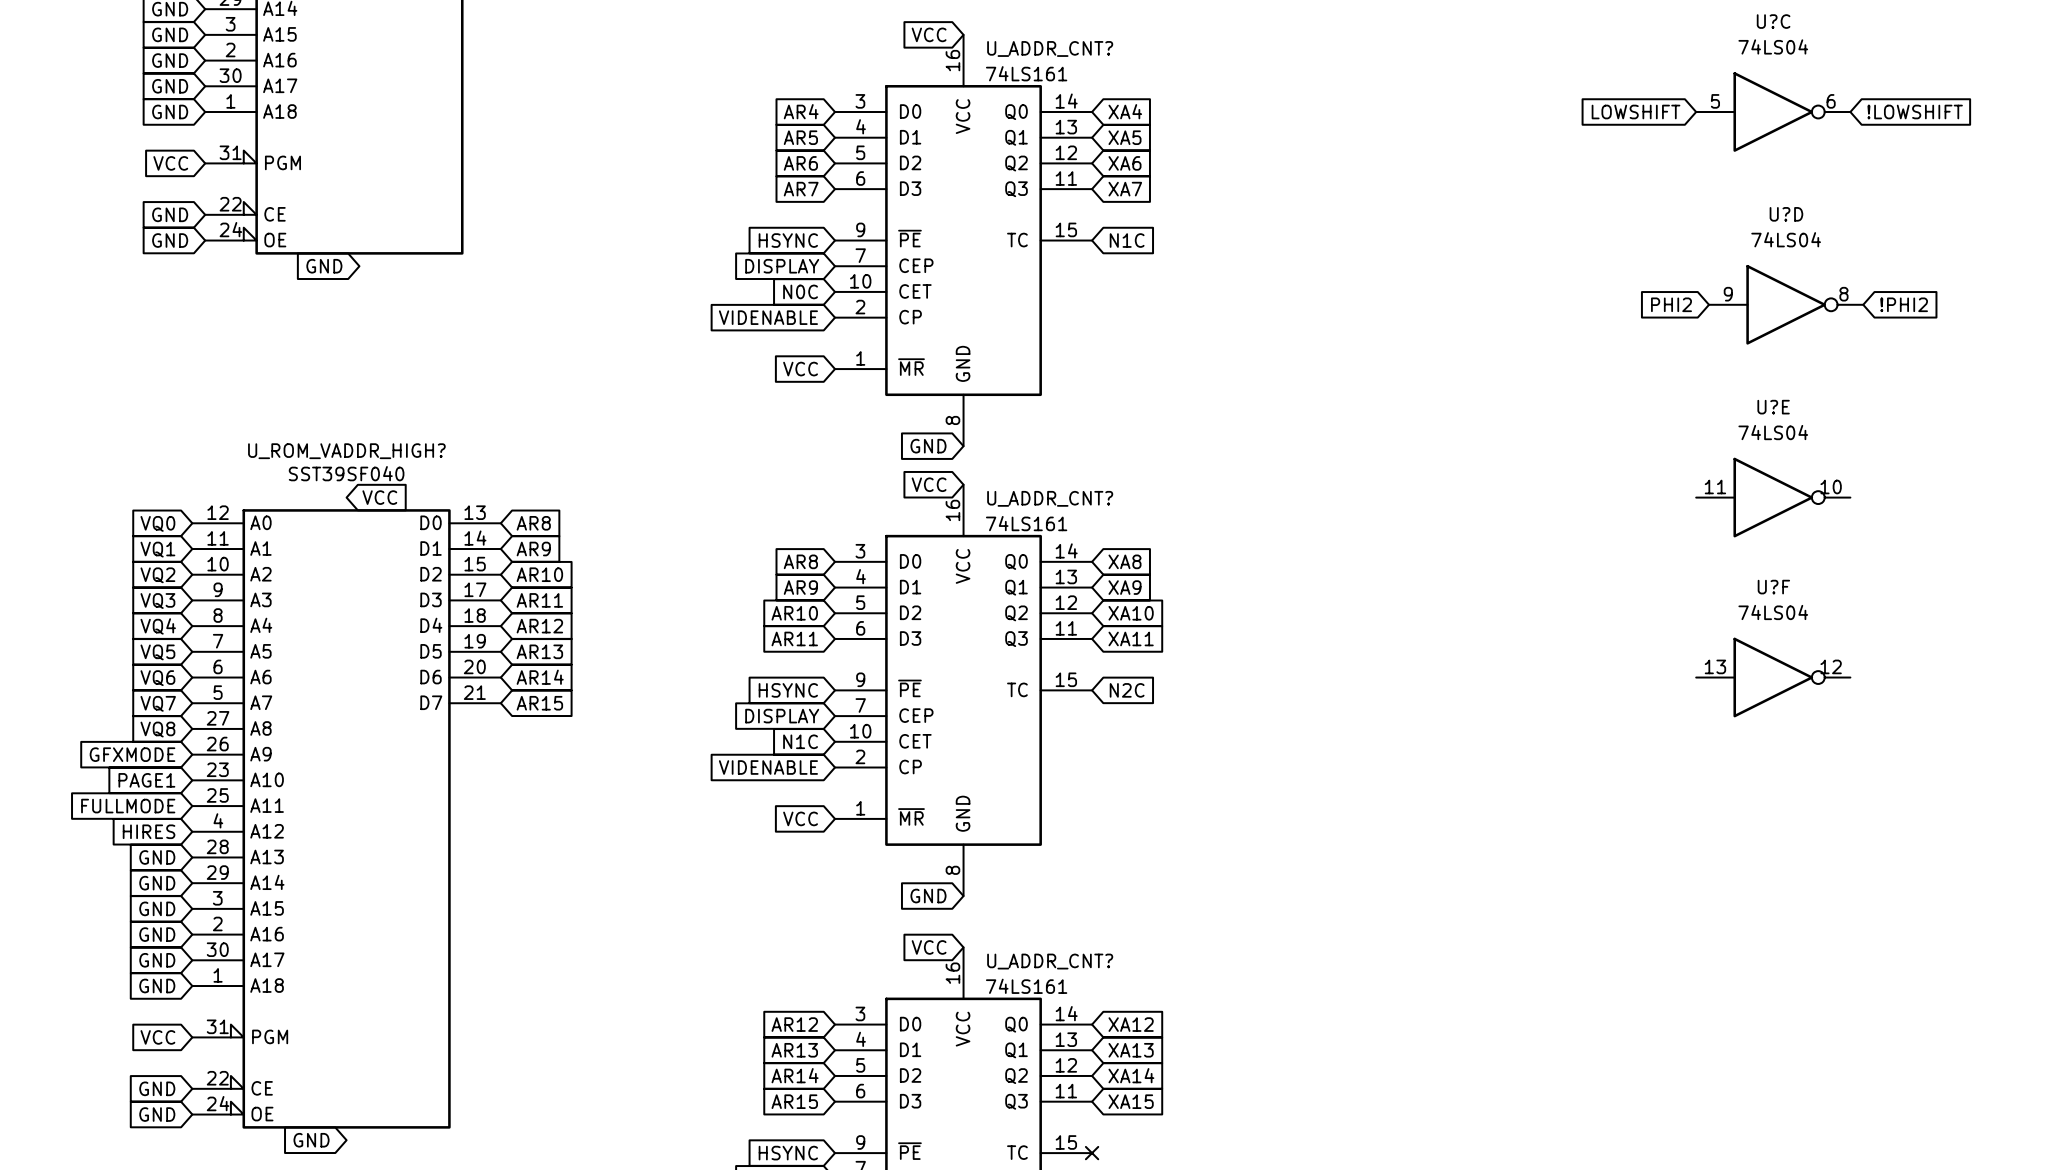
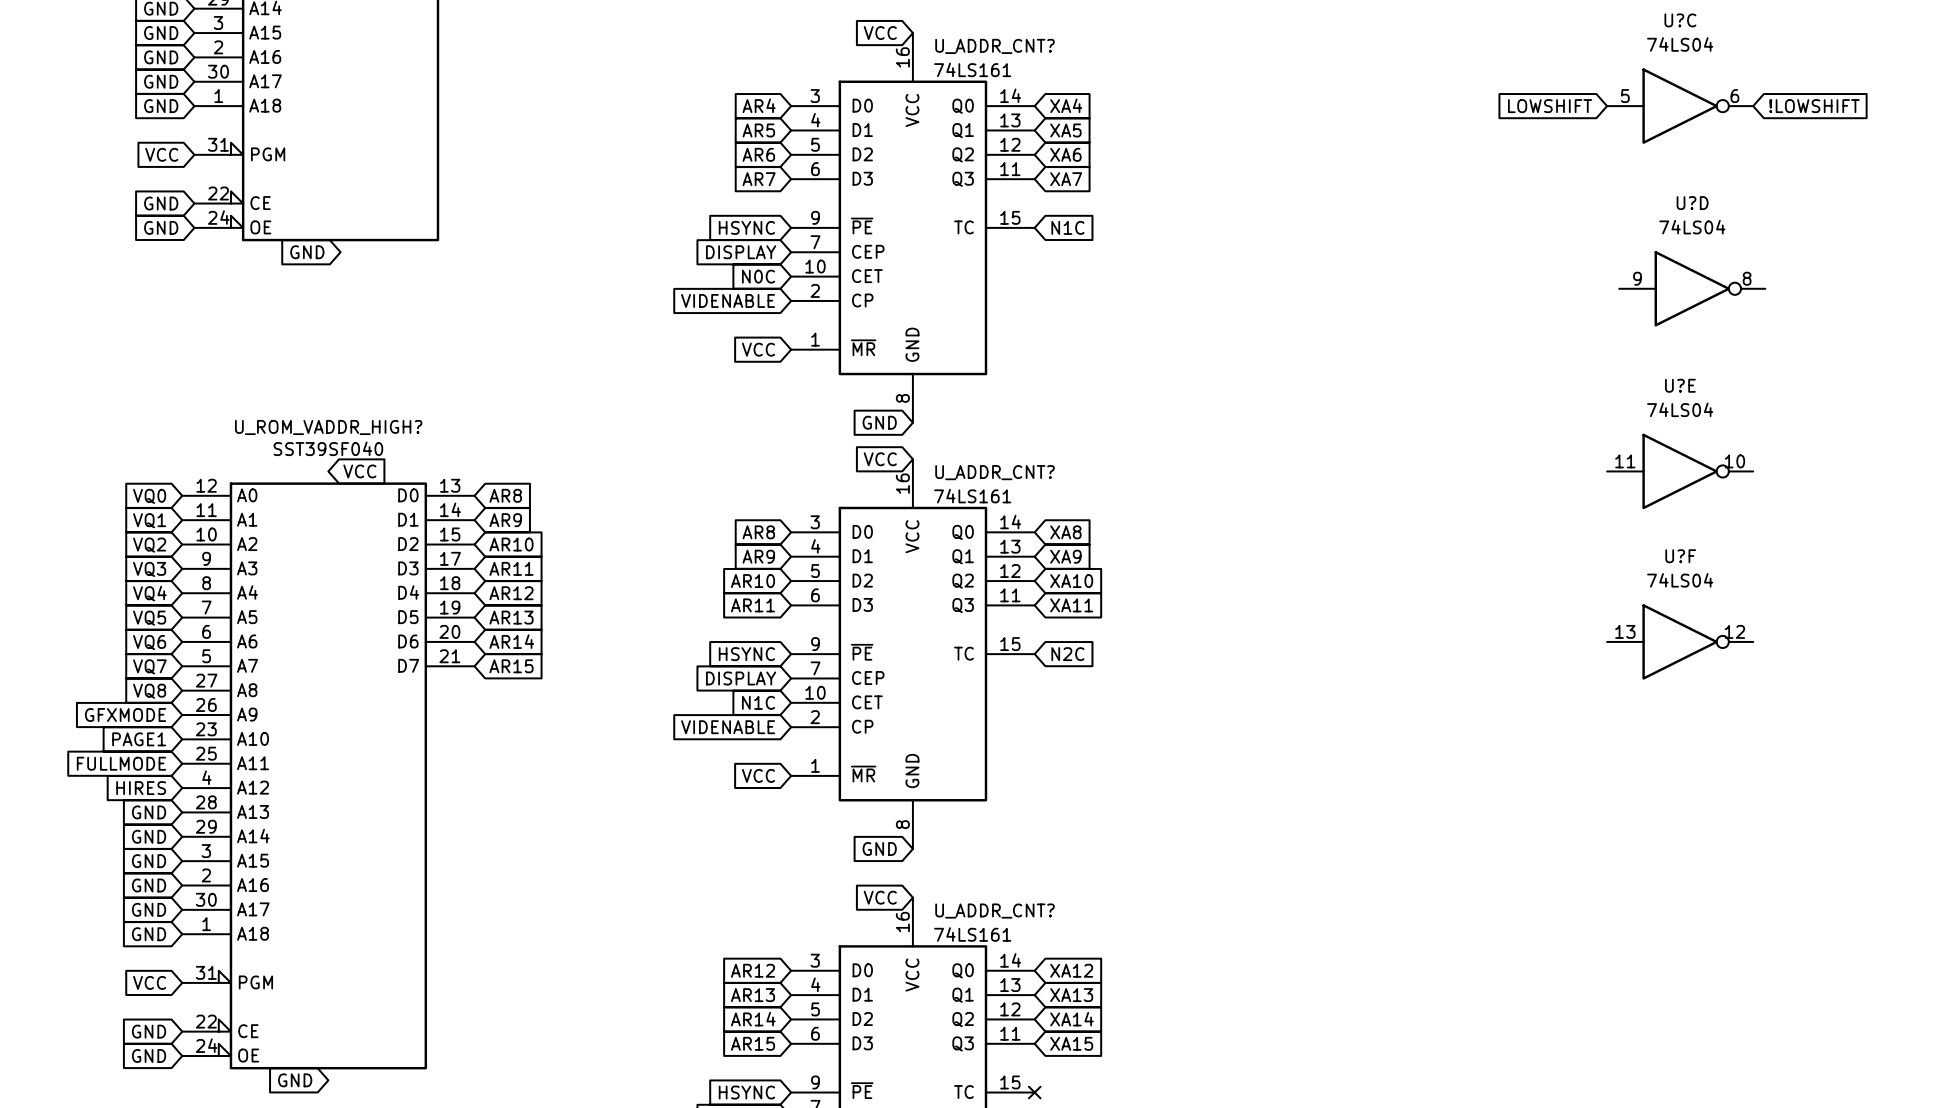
global label: PHI2 (1671, 304) -> none
global label: !PHI2 (1904, 304) -> none

